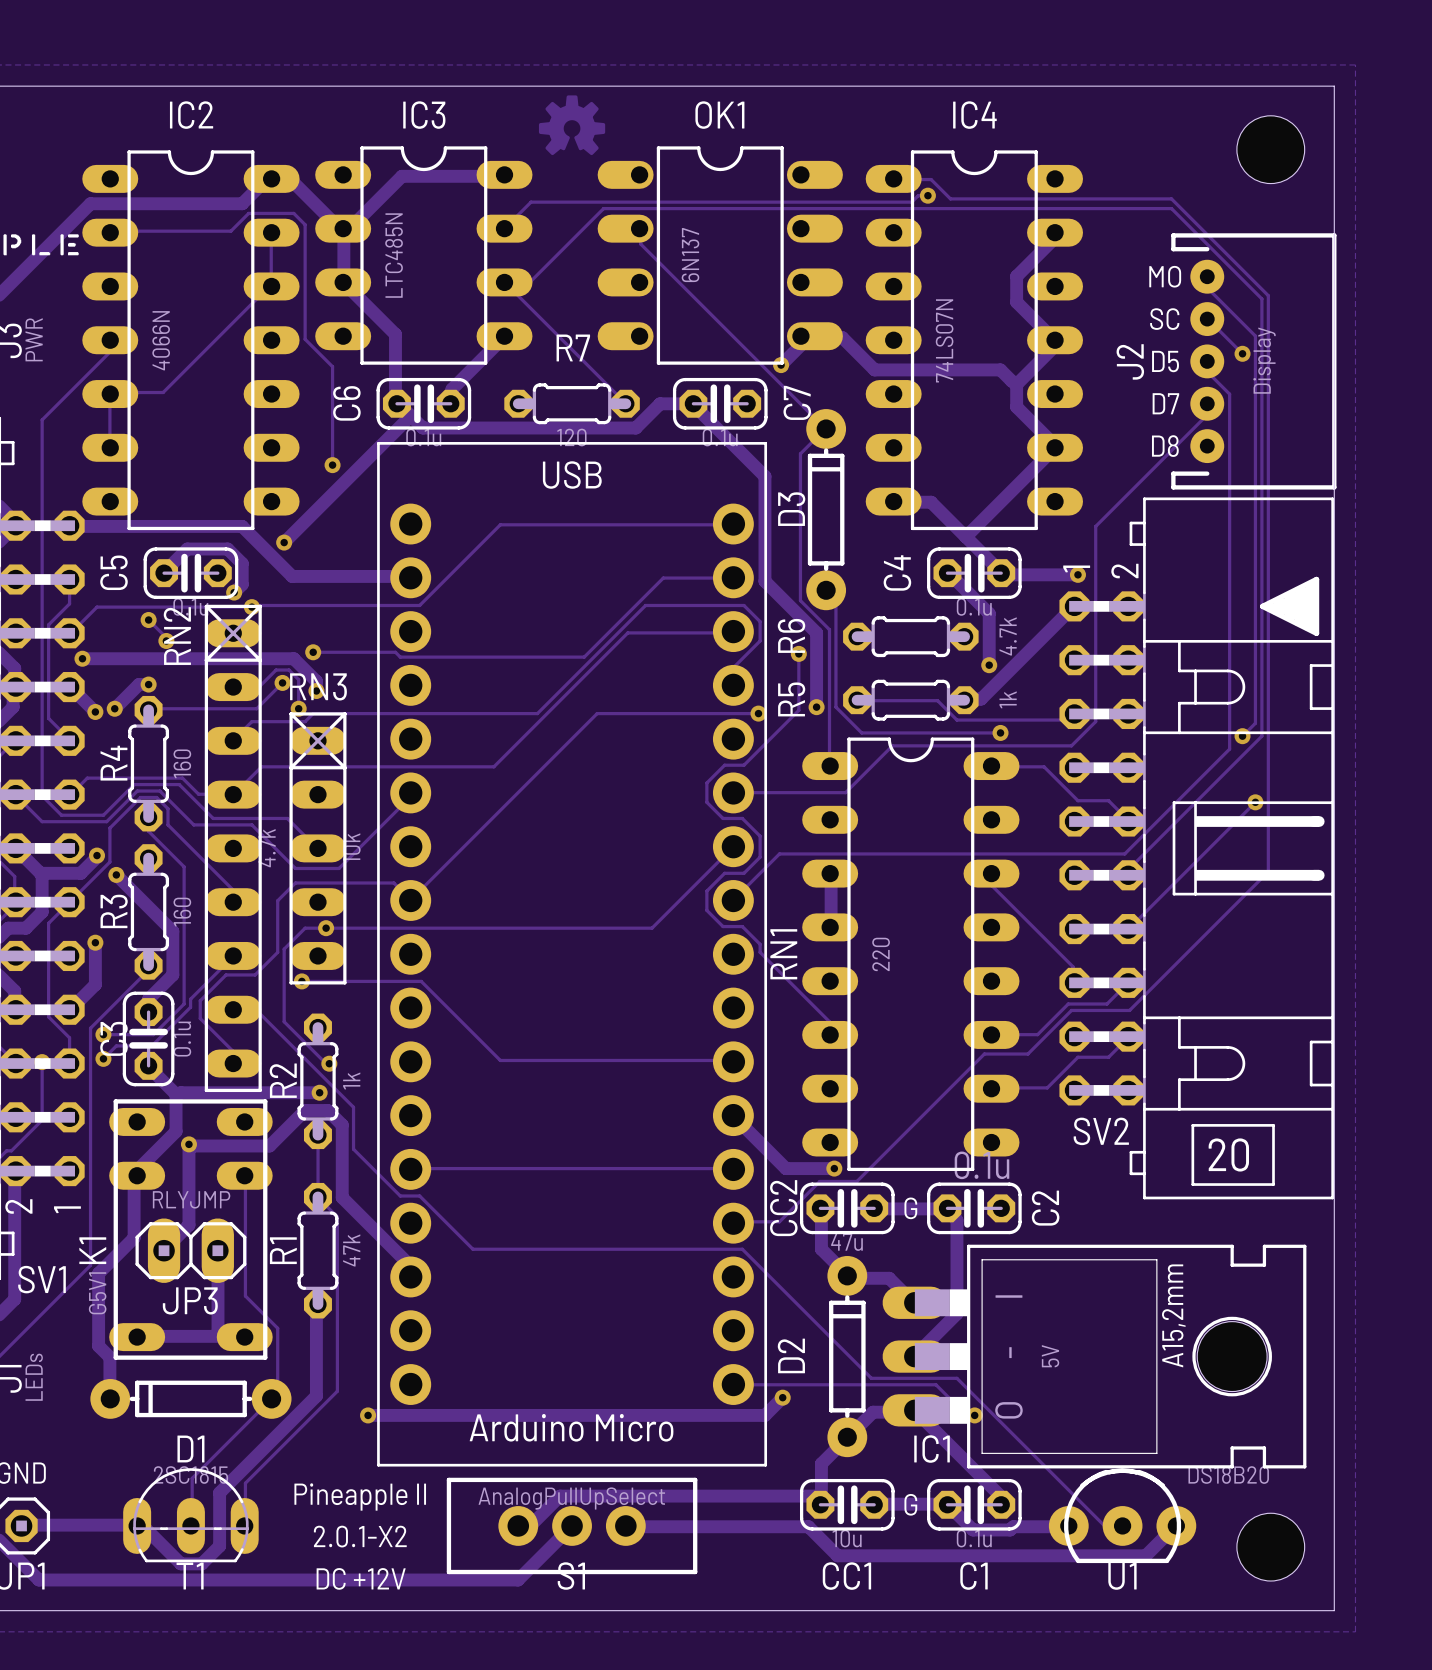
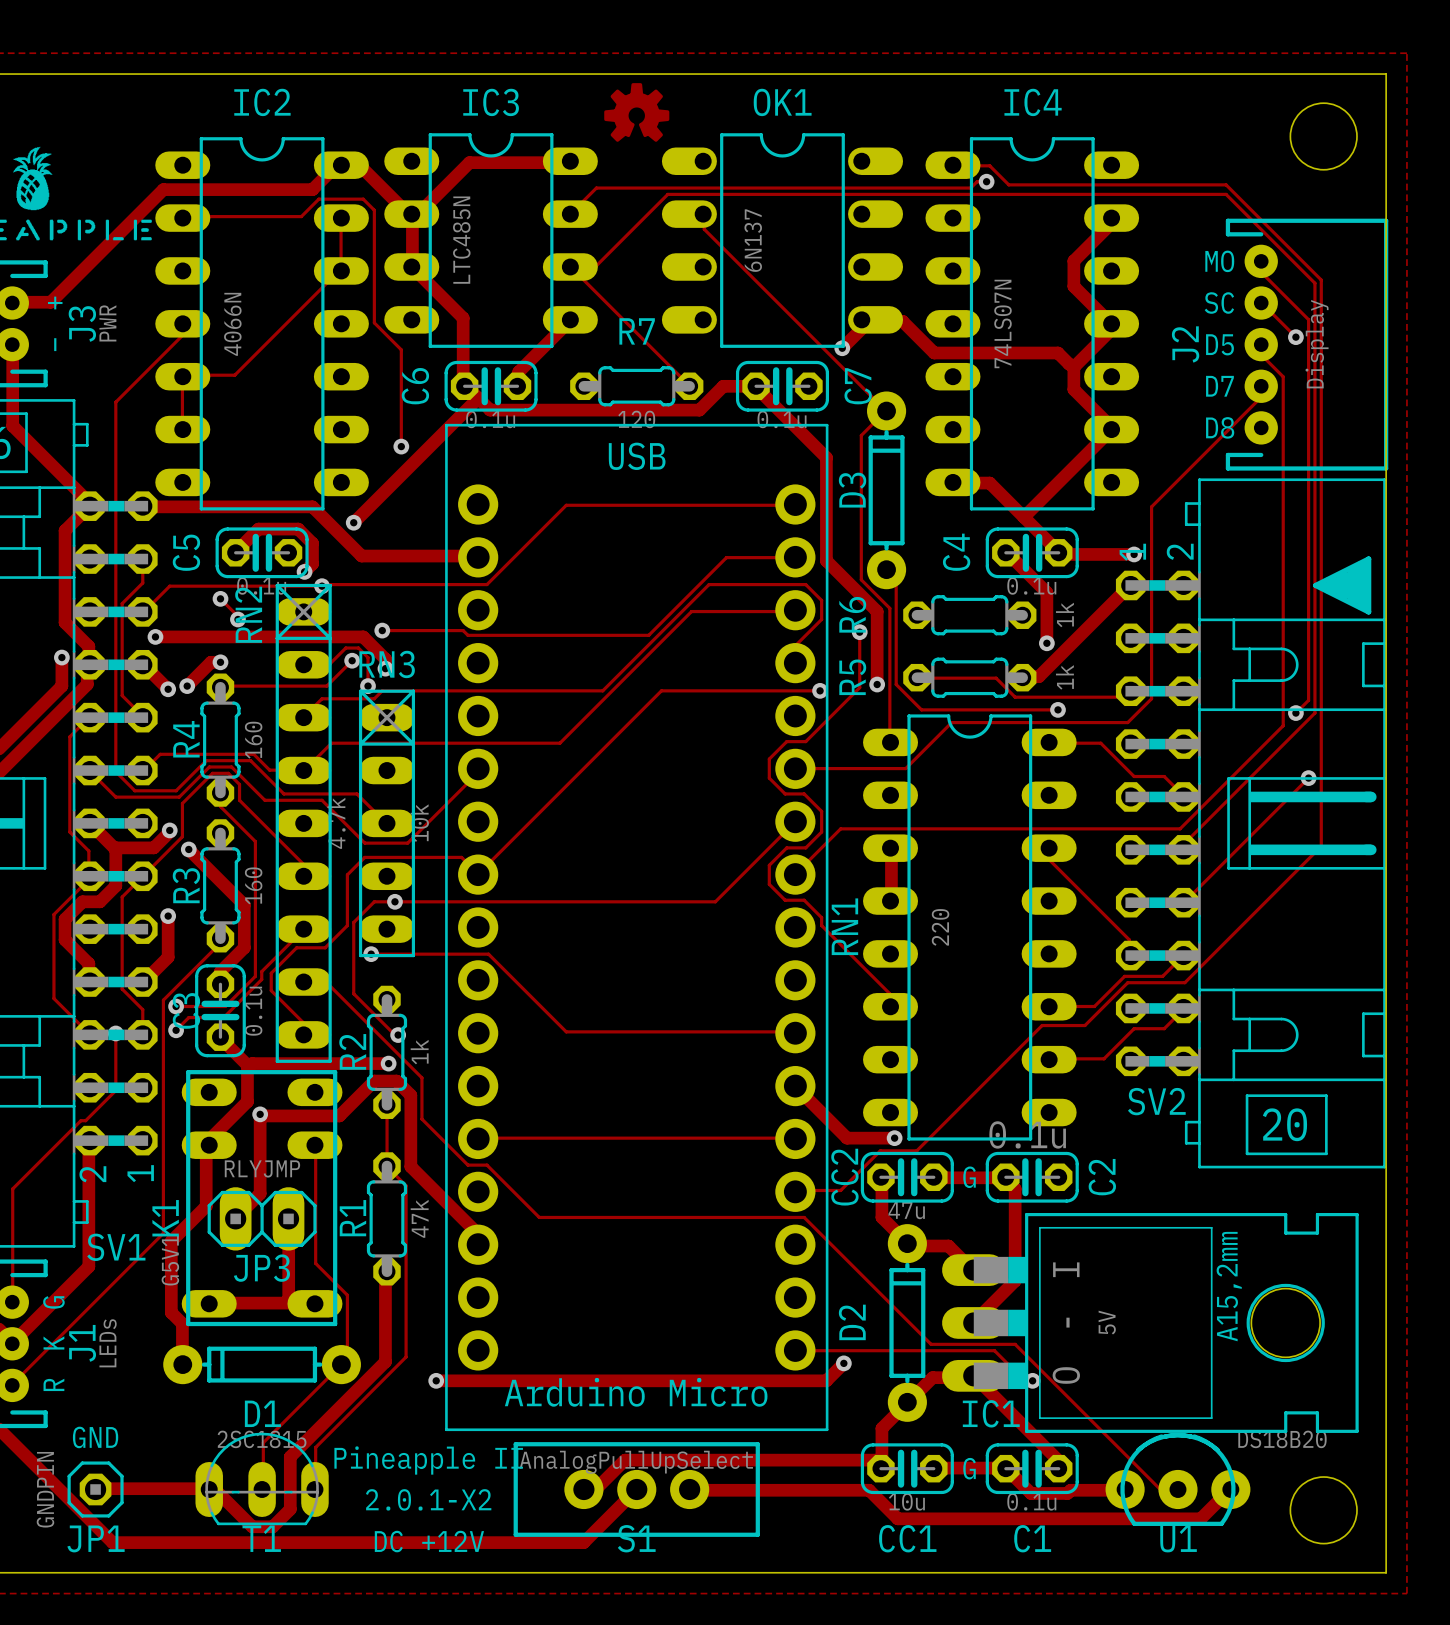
R6 value: 4.7k (1008, 636) -> 1k (1064, 614)

